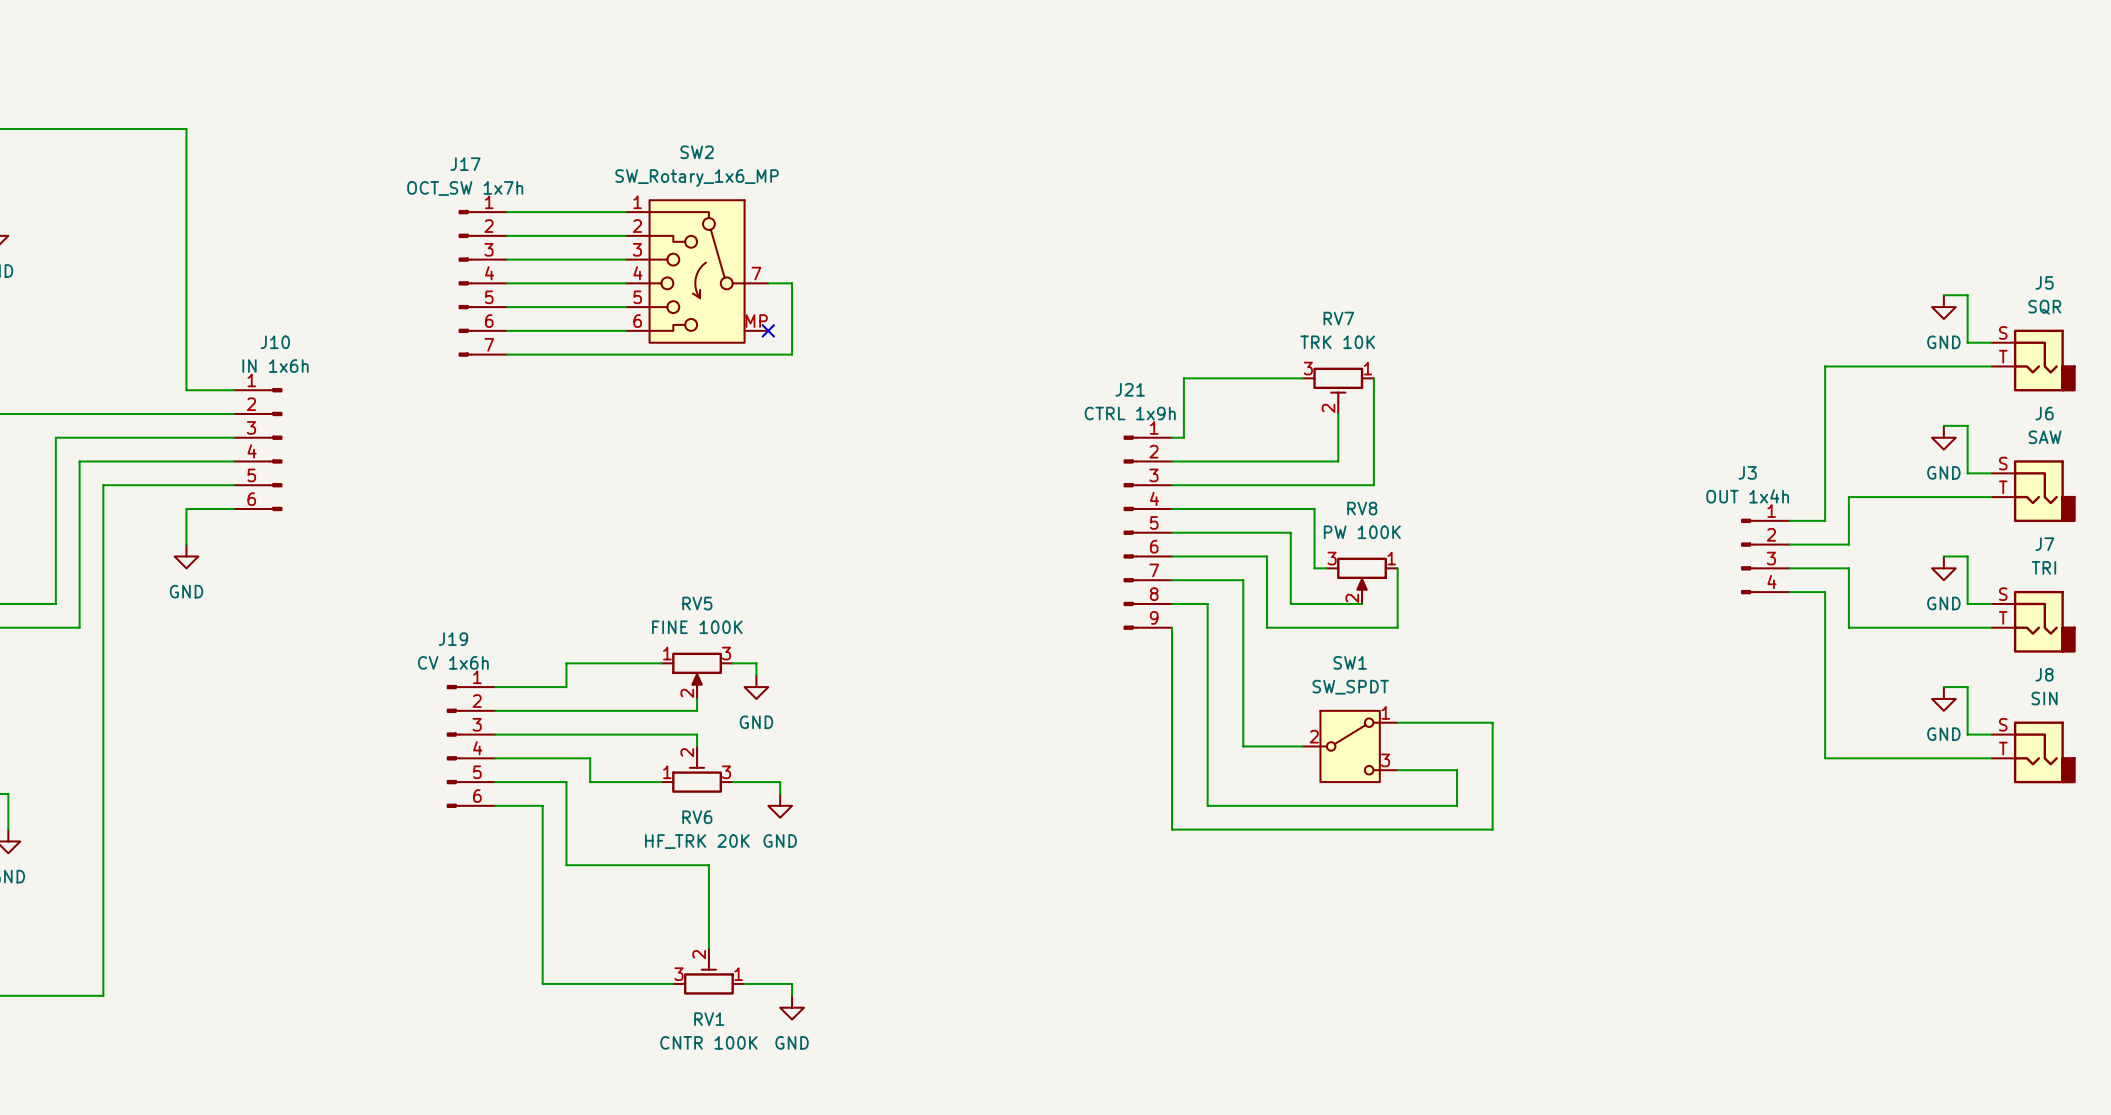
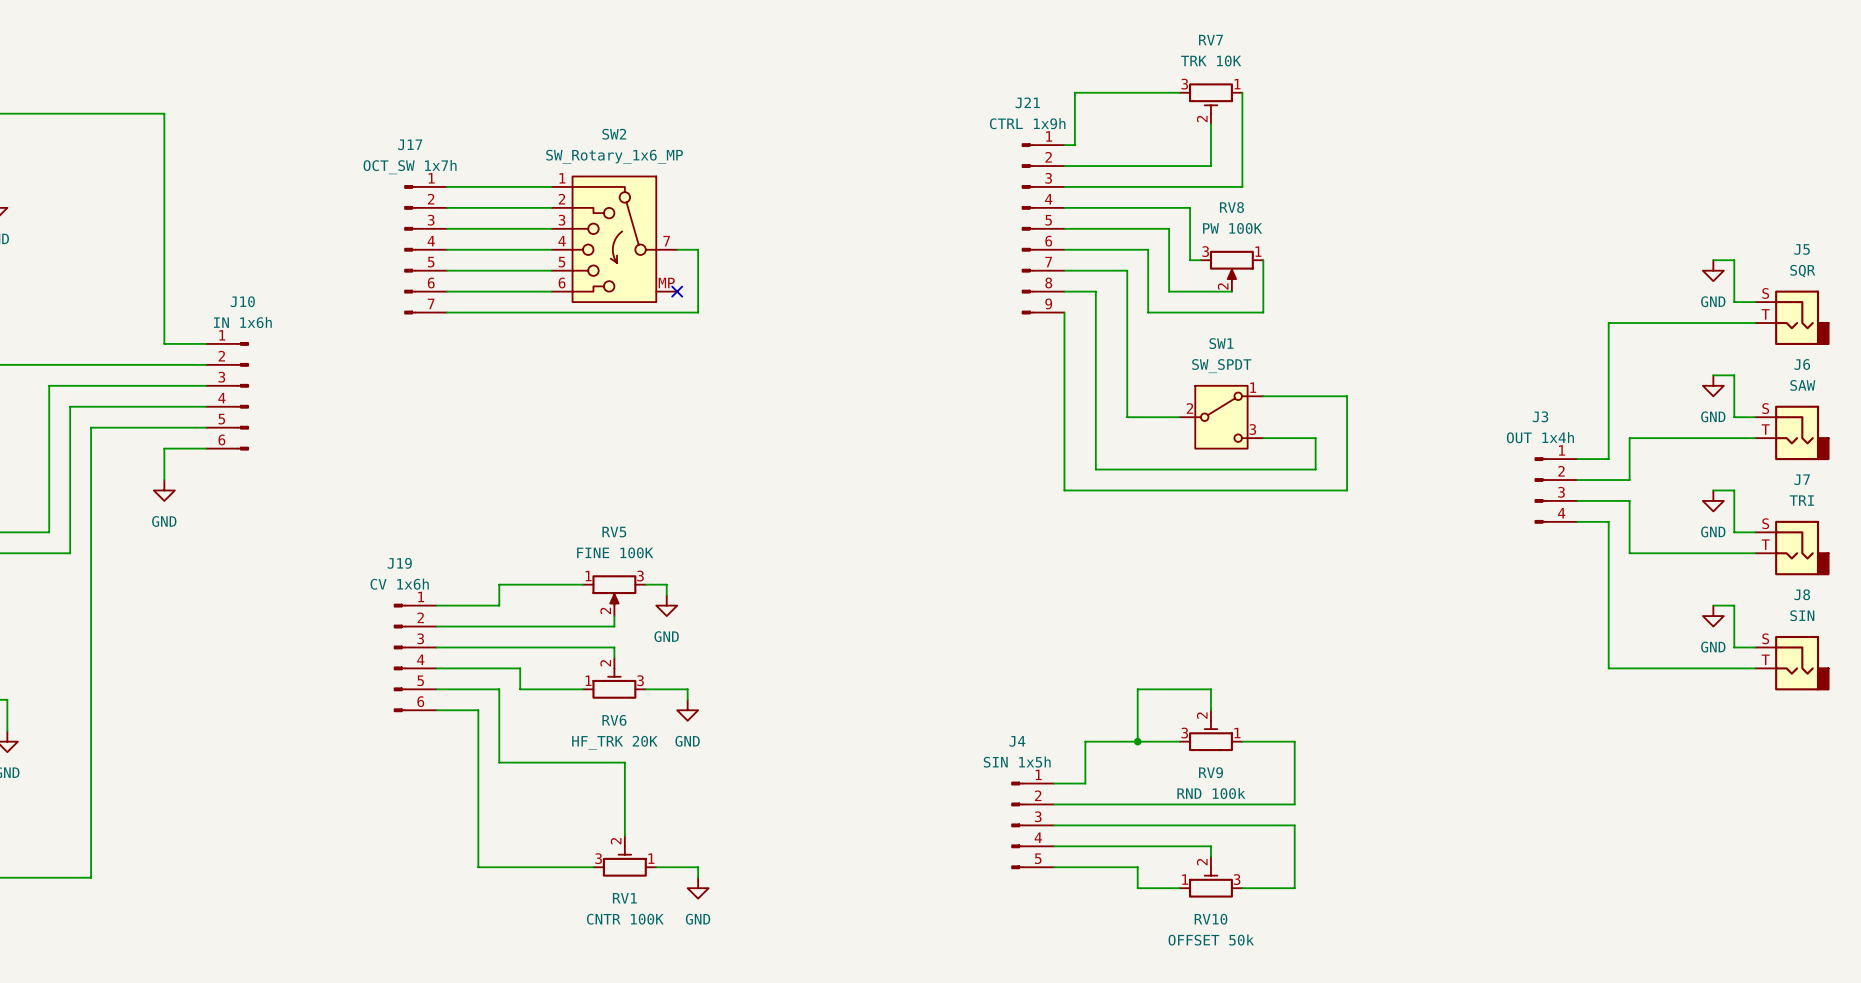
wire: none -> (1179, 92) (1074, 92) (1074, 145) (1064, 145)
wire: none -> (1242, 92) (1242, 186) (1064, 186)
wire: none -> (1210, 124) (1210, 166) (1064, 166)
wire: none -> (1064, 207) (1190, 207) (1190, 260) (1200, 260)
wire: none -> (1064, 228) (1169, 228) (1169, 291) (1231, 291)
wire: none -> (1064, 249) (1148, 249) (1148, 312) (1263, 312) (1263, 260)
wire: none -> (1064, 270) (1127, 270) (1127, 417) (1179, 417)
wire: (1302, 378) (1183, 378) (1183, 437) (1172, 437) -> none
wire: (1373, 378) (1373, 485) (1172, 485) -> none
RV7 position: (1338, 390) -> (1210, 103)
wire: (1338, 413) (1338, 461) (1172, 461) -> none
wire: (1172, 508) (1314, 508) (1314, 568) (1326, 568) -> none
J21 position: (1147, 532) -> (1043, 228)
wire: (1172, 532) (1243, 532) -> (1064, 291) (1095, 291) (1095, 469)
wire: (1290, 532) (1290, 603) (1362, 603) -> (1137, 469) (1315, 469) (1315, 438) (1263, 438)
wire: (1172, 556) (1207, 556) -> (1064, 312) (1064, 490)
wire: (1267, 556) (1267, 627) (1397, 627) (1397, 568) -> (1116, 490) (1347, 490) (1347, 396) (1263, 396)
wire: (1172, 580) (1243, 580) (1243, 746) (1302, 746) -> none
RV8 position: (1362, 580) -> (1231, 271)
wire: (1172, 603) (1207, 603) (1207, 805) (1457, 805) (1457, 770) (1397, 770) -> none
wire: (1172, 627) (1172, 829) (1492, 829) (1492, 722) (1397, 722) -> none
SW1 position: (1350, 746) -> (1221, 417)
wire: none -> (1210, 710) (1210, 689) (1137, 689) (1137, 741)
RV9: none -> RND 100k (1210, 730)
junction: none -> (1137, 741)
wire: none -> (1179, 741) (1085, 741) (1085, 783) (1053, 783)
wire: none -> (1242, 741) (1294, 741) (1294, 804) (1053, 804)
J4: none -> SIN 1x5h (1032, 825)
wire: none -> (1053, 825) (1294, 825) (1294, 888) (1242, 888)
wire: none -> (1053, 846) (1210, 846) (1210, 856)
wire: none -> (1053, 867) (1137, 867) (1137, 888) (1179, 888)
RV10: none -> OFFSET 50k (1210, 877)

